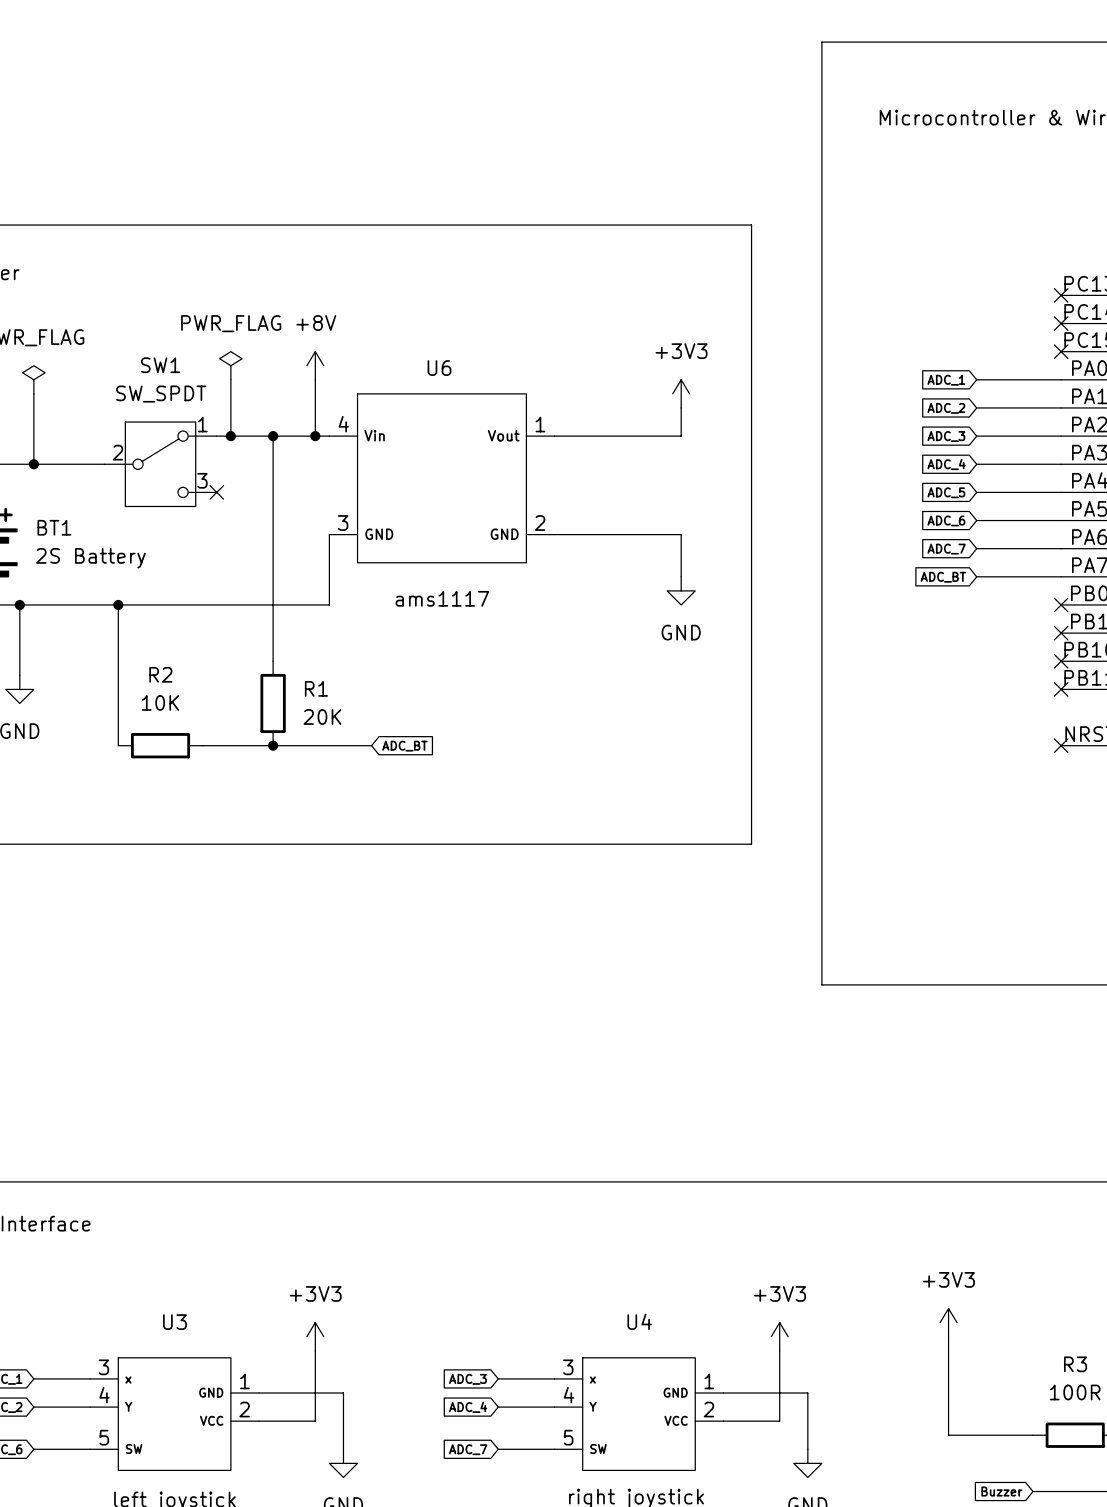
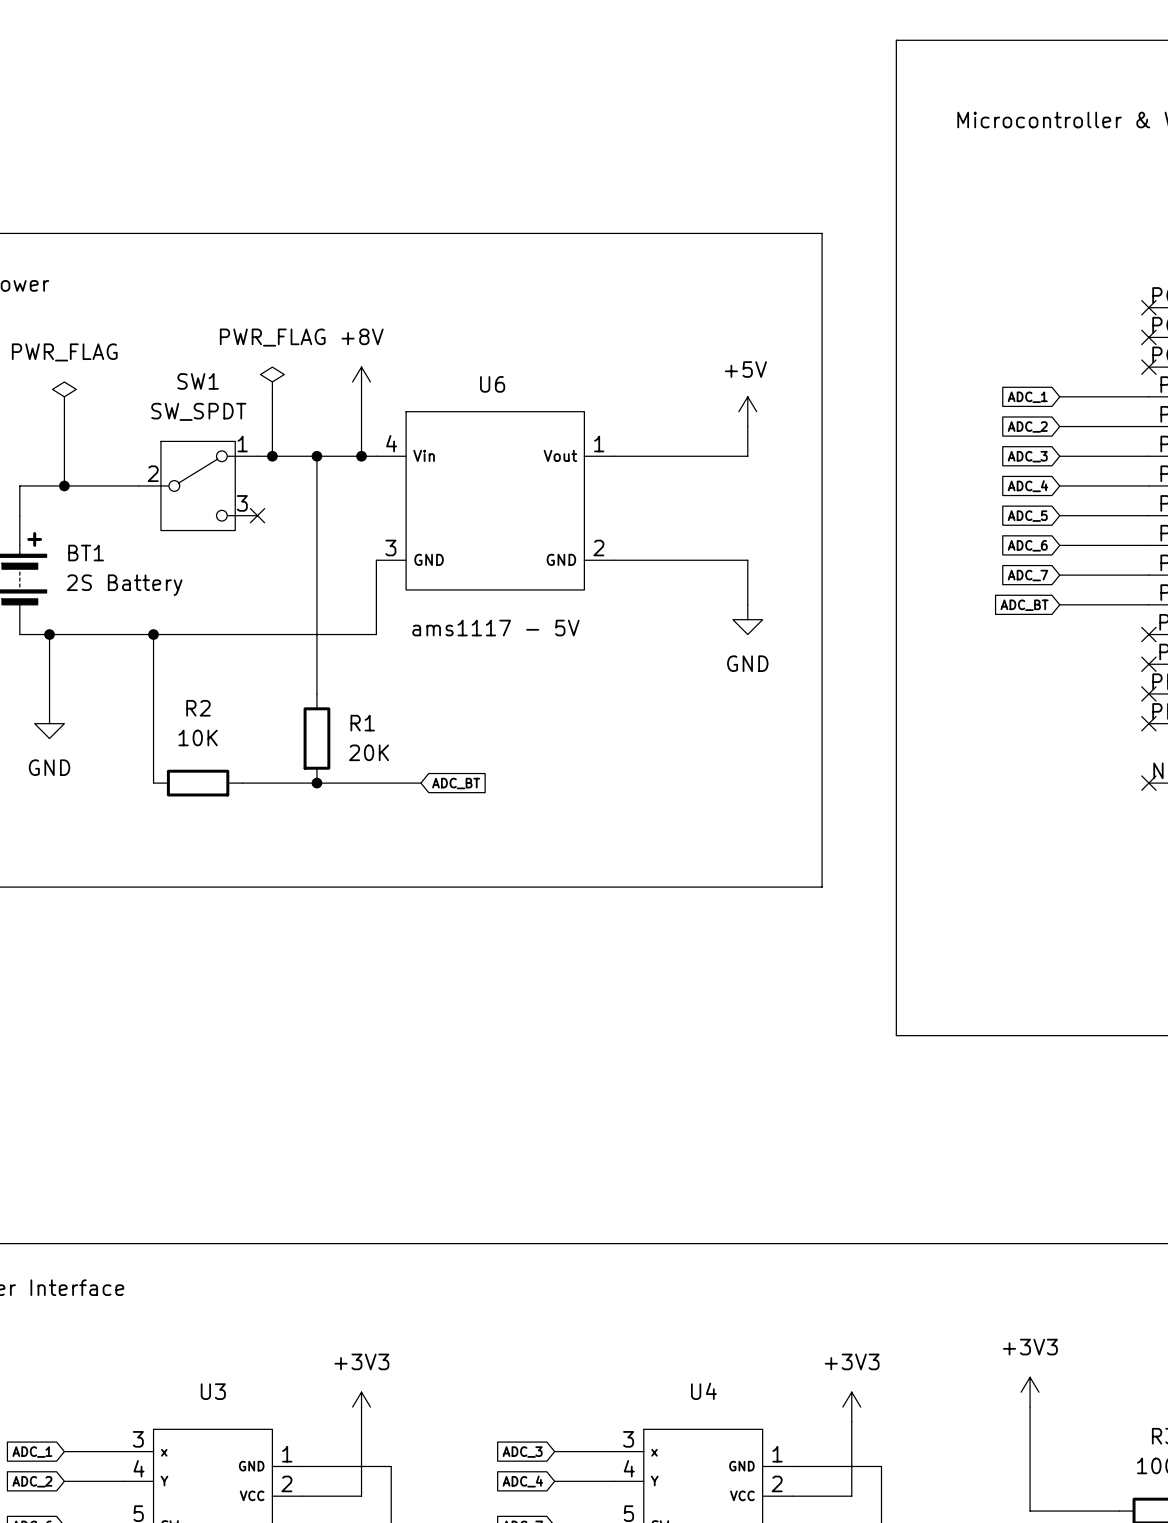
power symbol: +3V3 (681, 393) -> +5V (747, 411)
U6 value: ams1117 (442, 598) -> ams1117 - 5V (495, 628)

